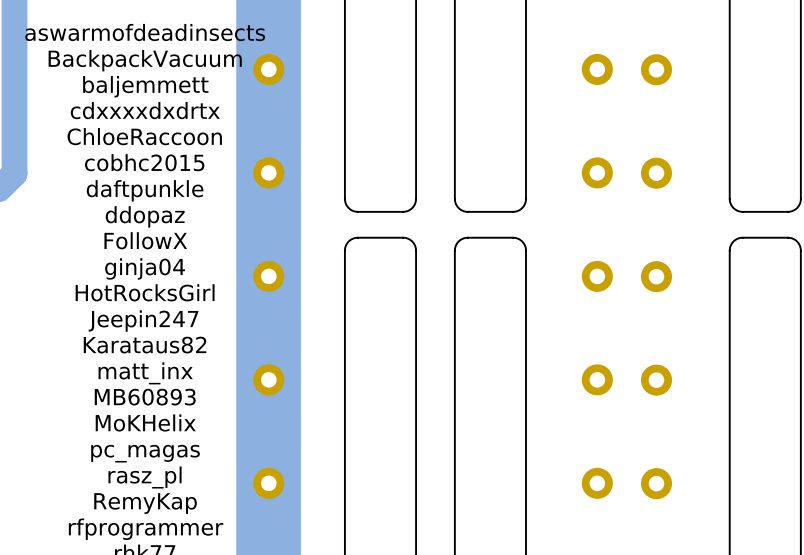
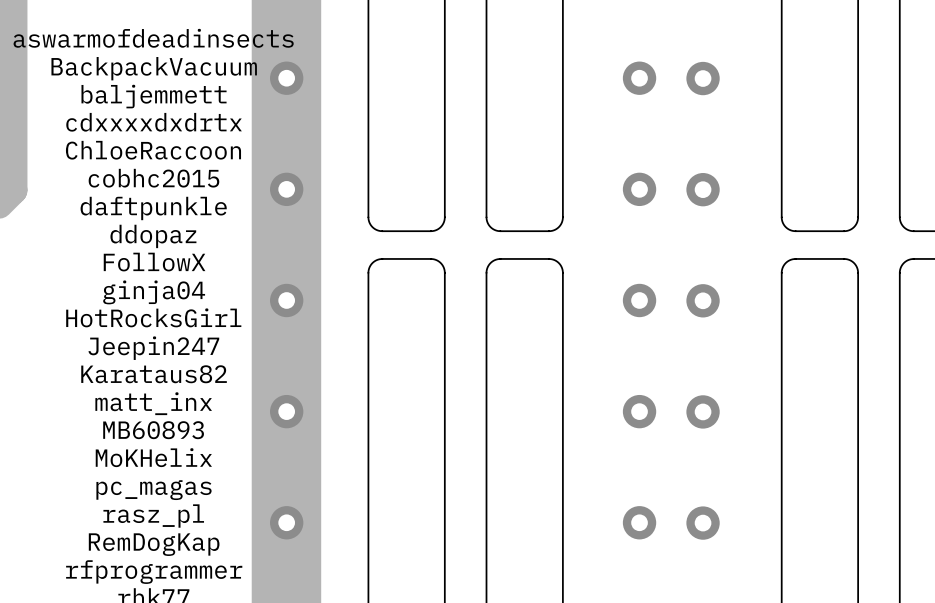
text: RemyKap (145, 503) -> RemDogKap (154, 544)

